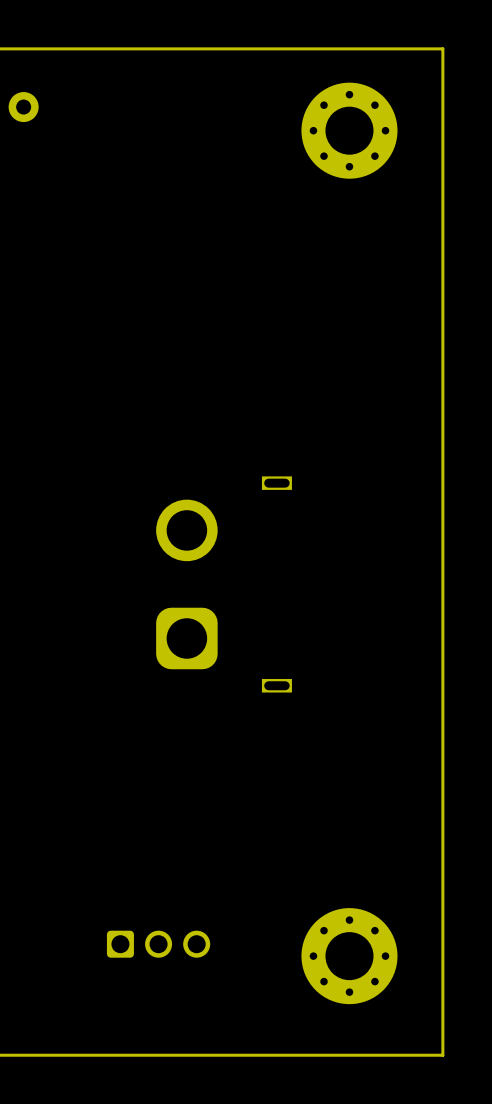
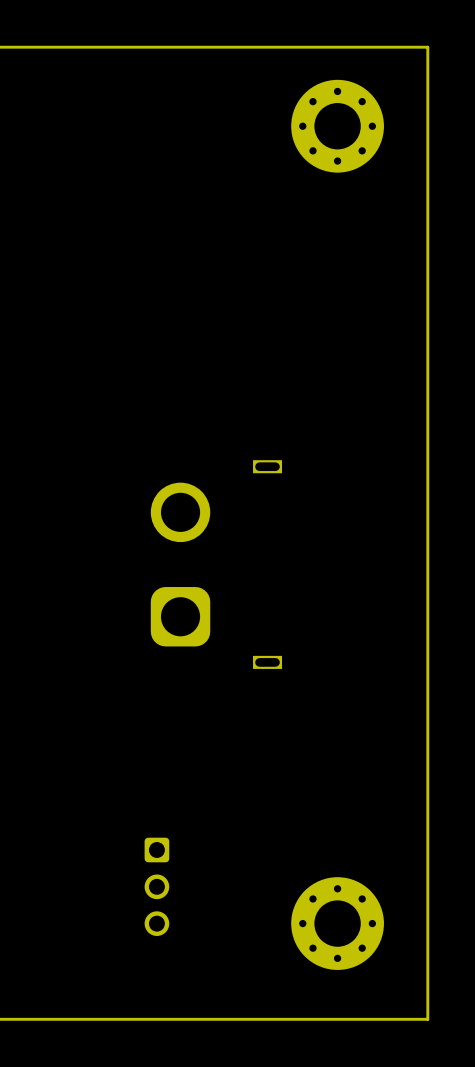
part: (23, 107) -> none
part: none -> (156, 886)
part: (158, 944) -> none

